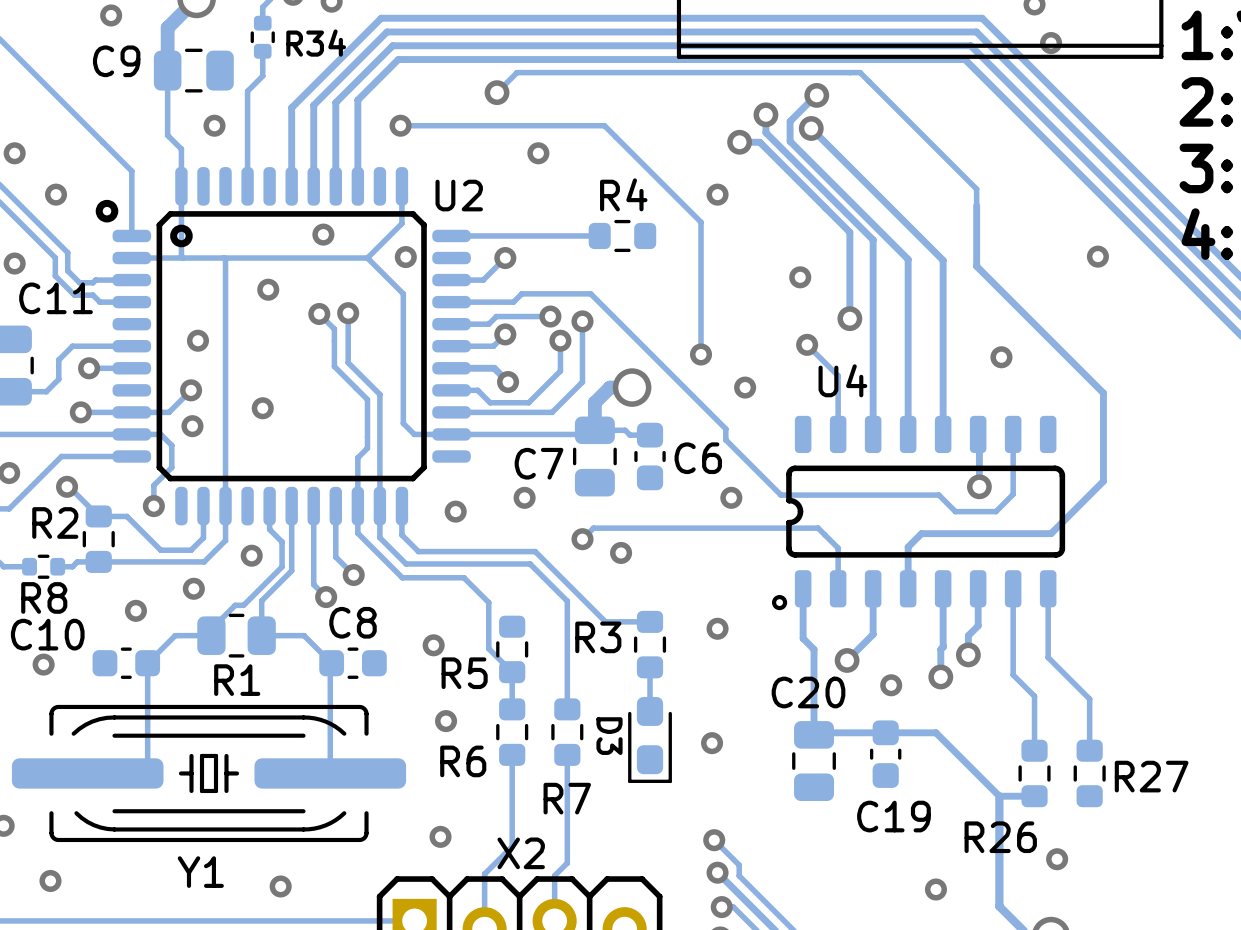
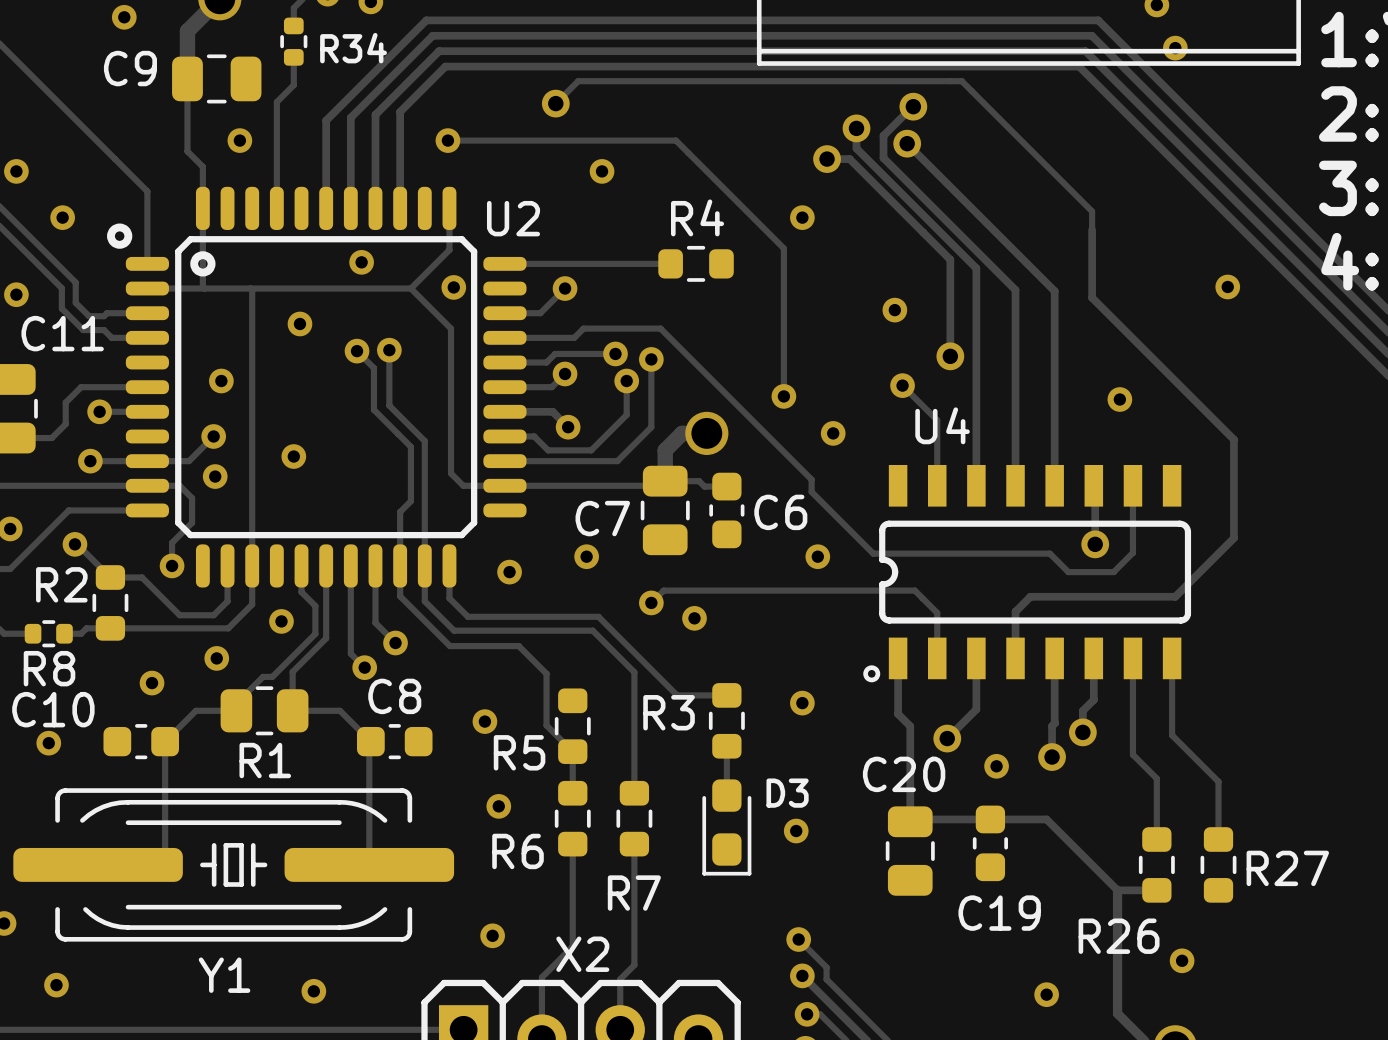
U4 footprint: [771, 415, 1066, 611] -> [863, 464, 1192, 683]
D3 name rotation: 0° (609, 736) -> 90° counterclockwise (787, 793)
D3 name position: D3 (609, 736) -> D3 (787, 793)

